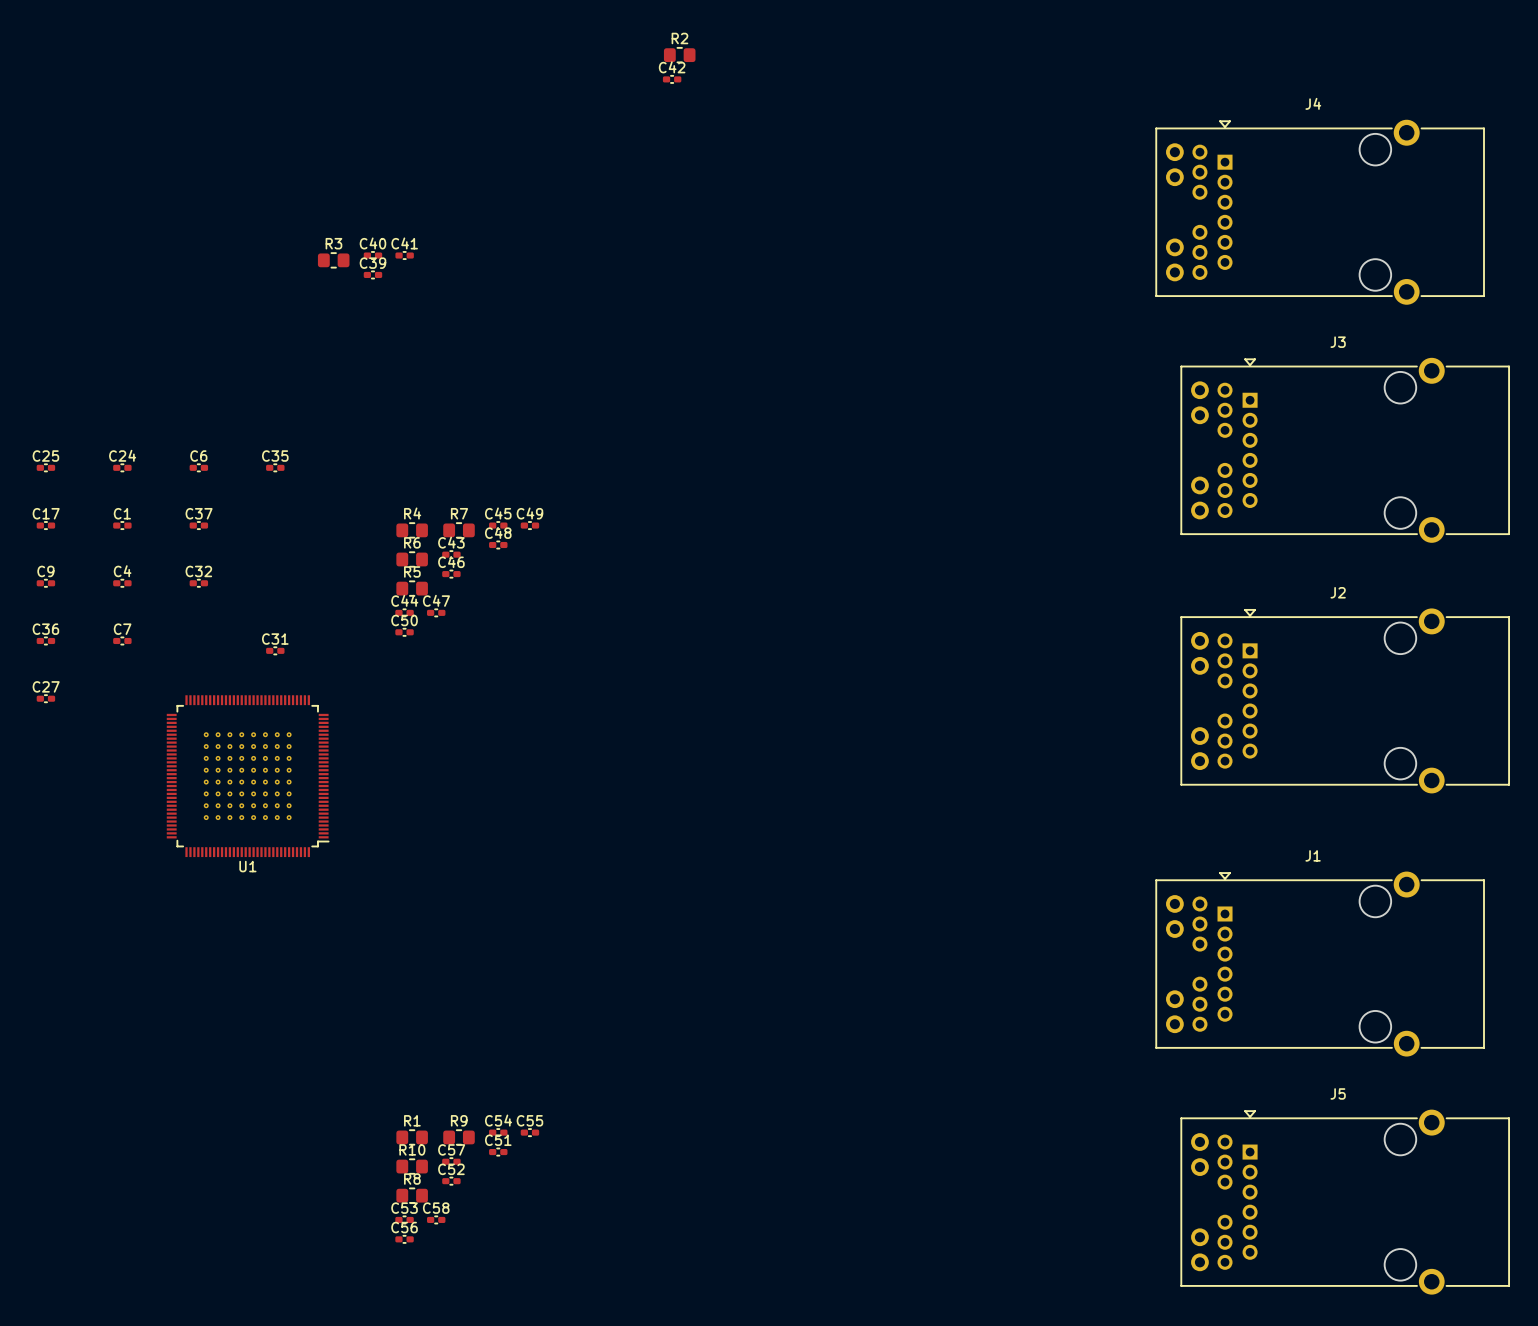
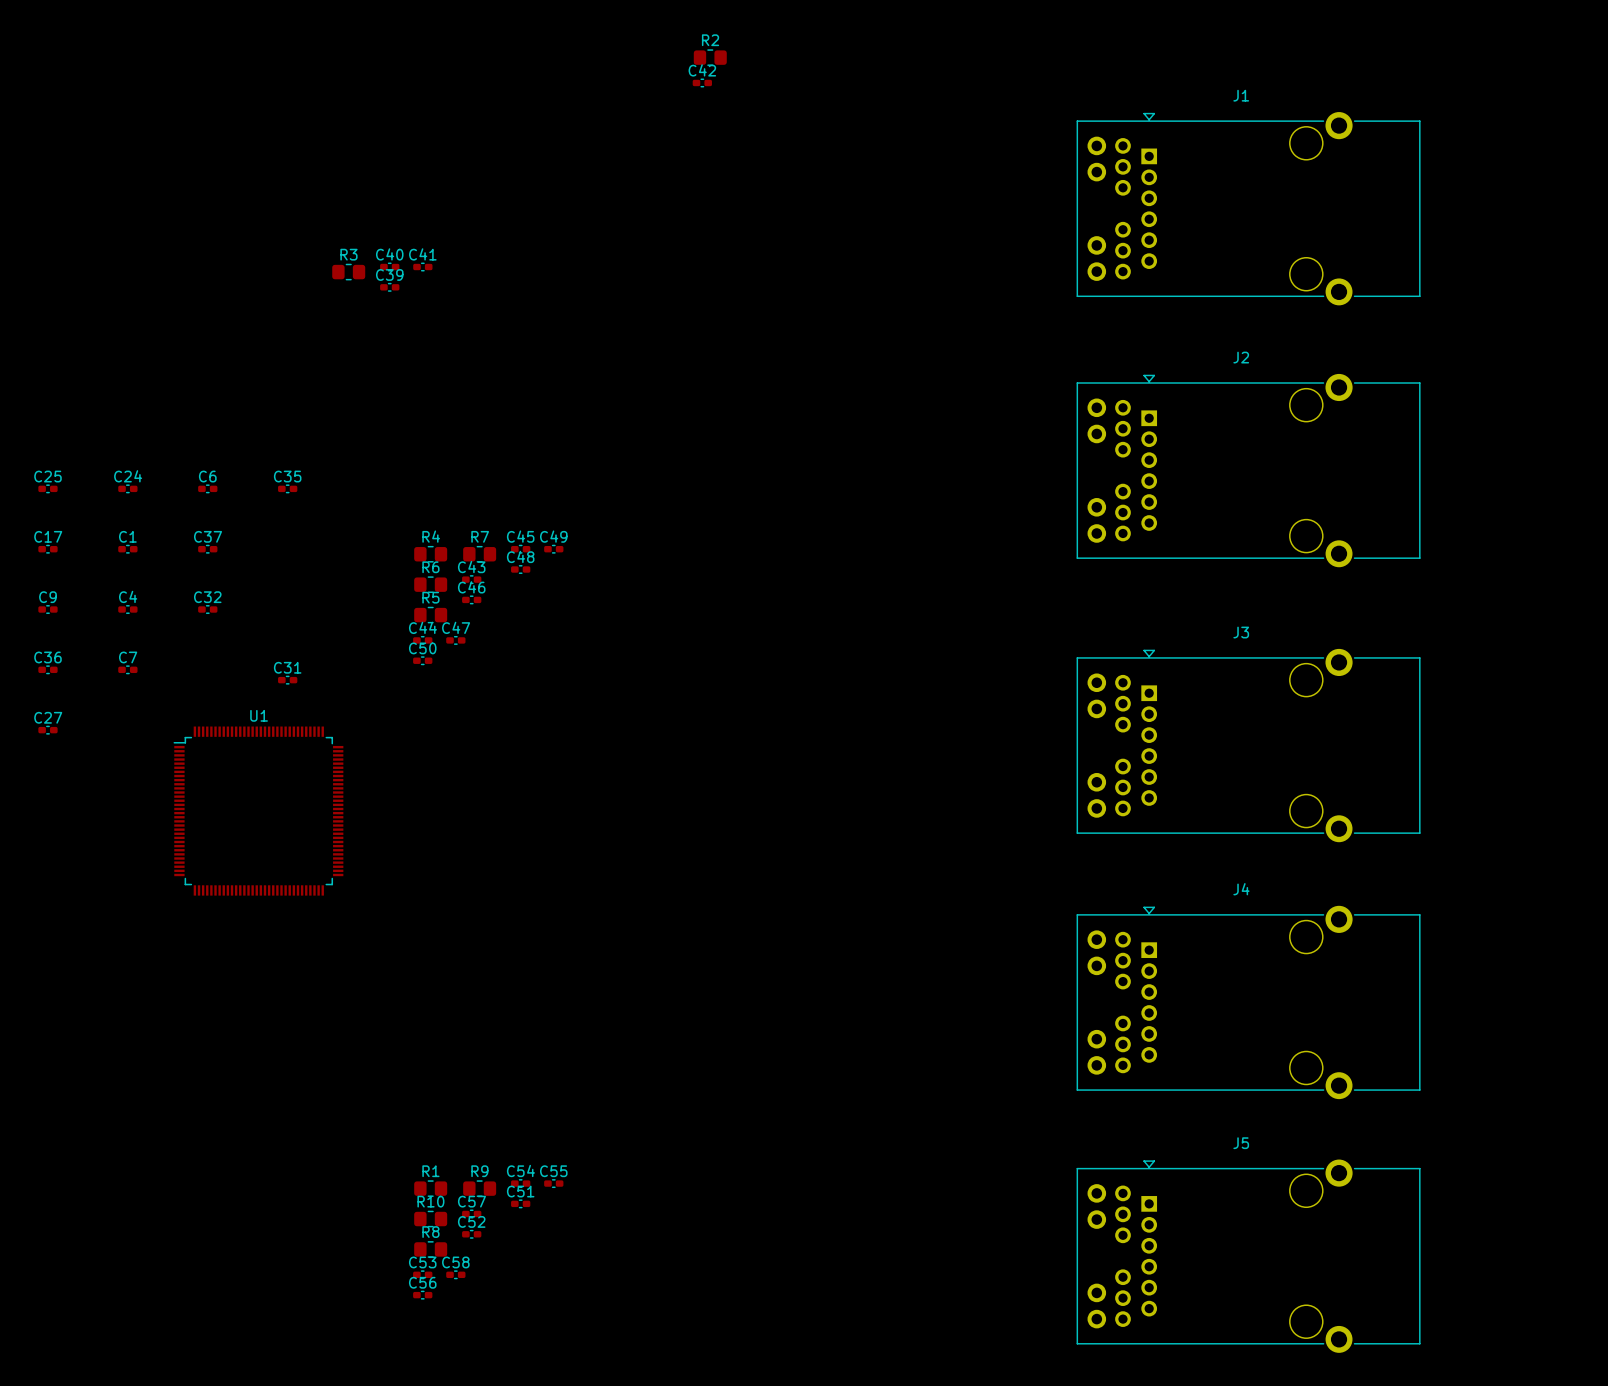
J4 position: (1320, 212) -> (1248, 1002)
J3 position: (1345, 450) -> (1248, 745)
U1 footprint: [166, 695, 330, 858] -> [173, 726, 344, 896]
J2 position: (1345, 700) -> (1248, 470)
U1 name position: U1 (247, 866) -> U1 (259, 715)
J1 position: (1320, 964) -> (1248, 208)
J5 position: (1345, 1202) -> (1248, 1256)

